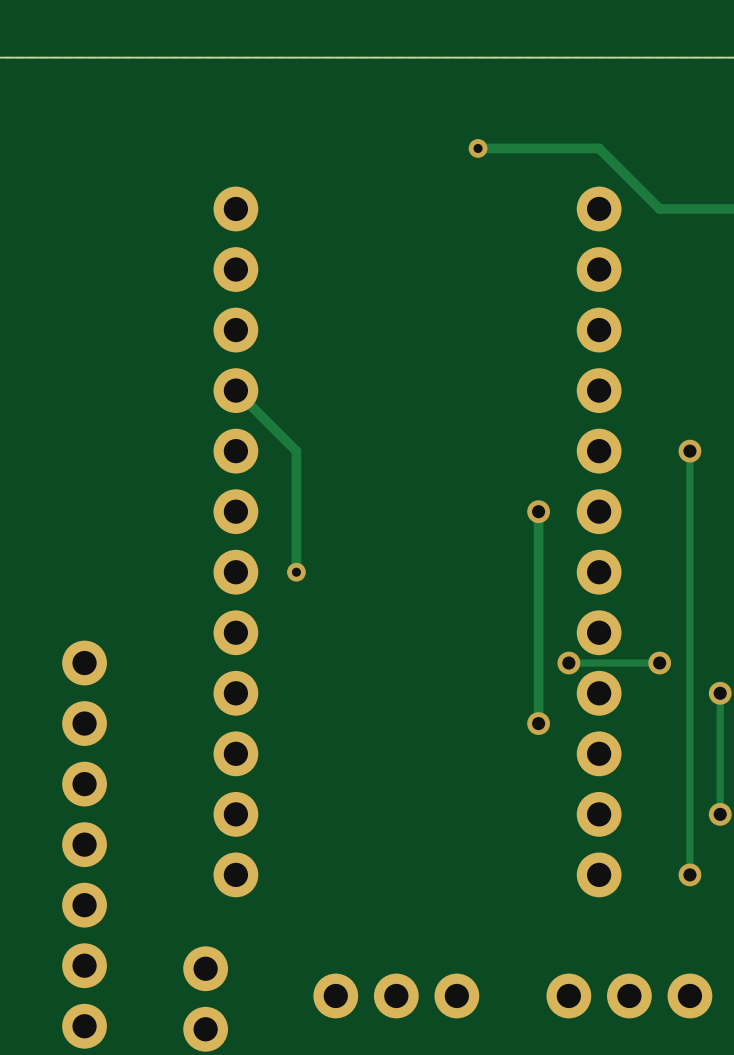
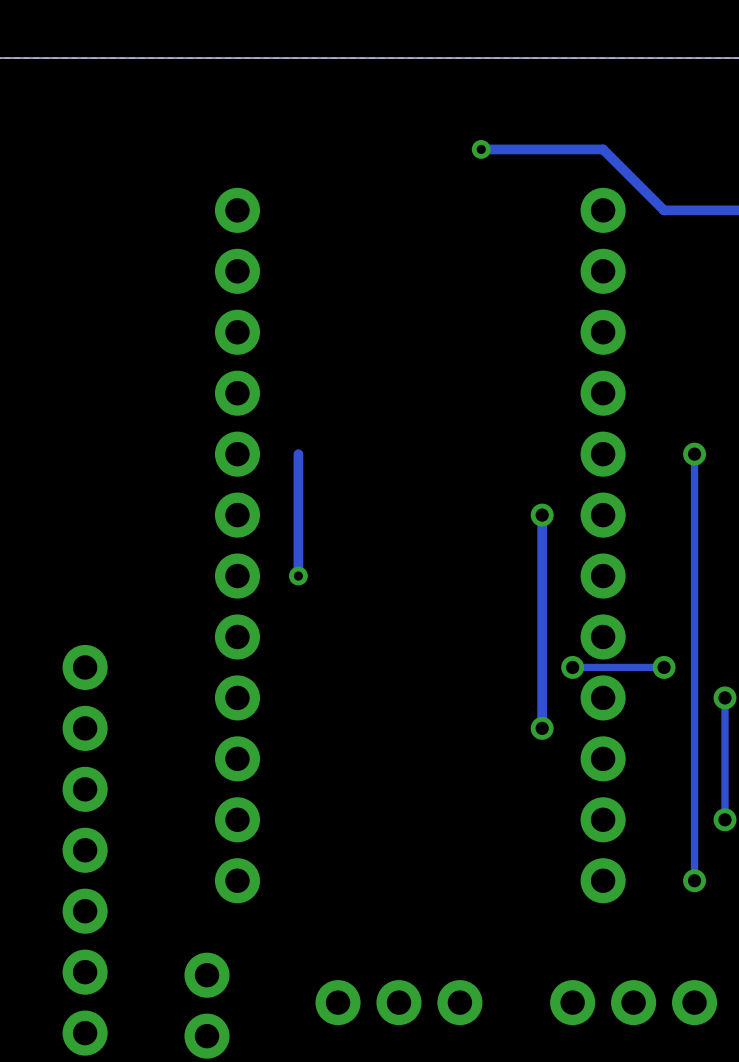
track: (235, 390) (296, 451) -> none

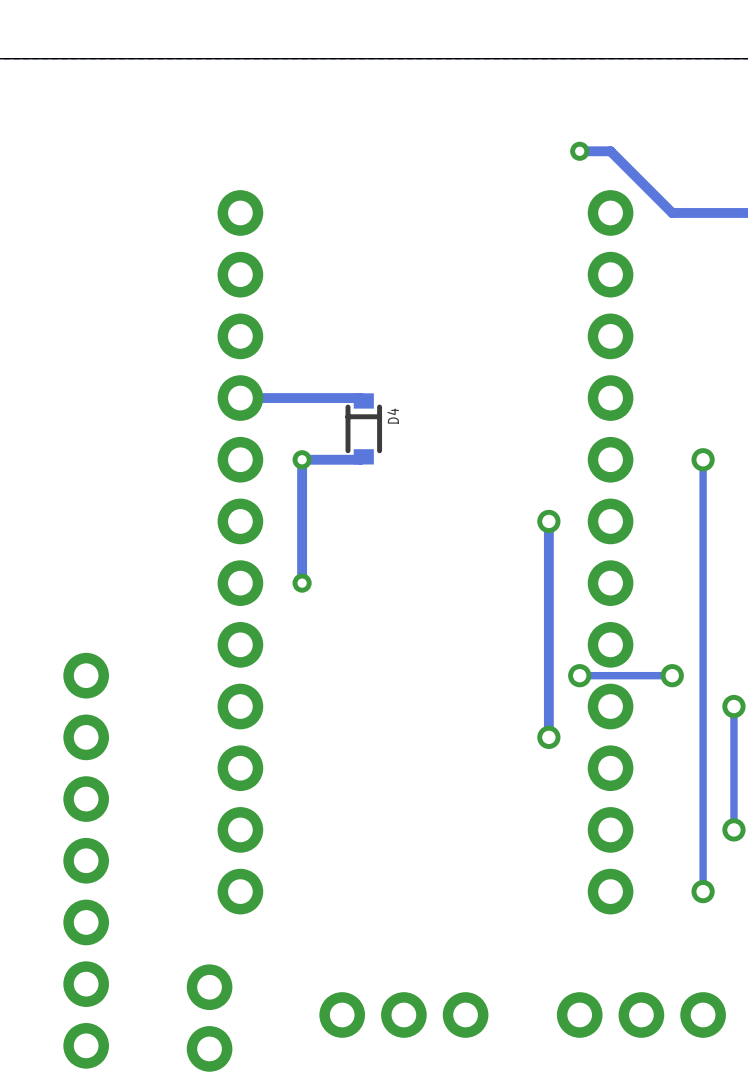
via position: (481, 149) -> (579, 151)
track: (572, 149) (481, 149) -> none
track: none -> (240, 398) (360, 398) (363, 400)
D4: none -> (363, 428)
track: none -> (363, 456) (360, 459) (302, 459)
via: none -> (302, 459)

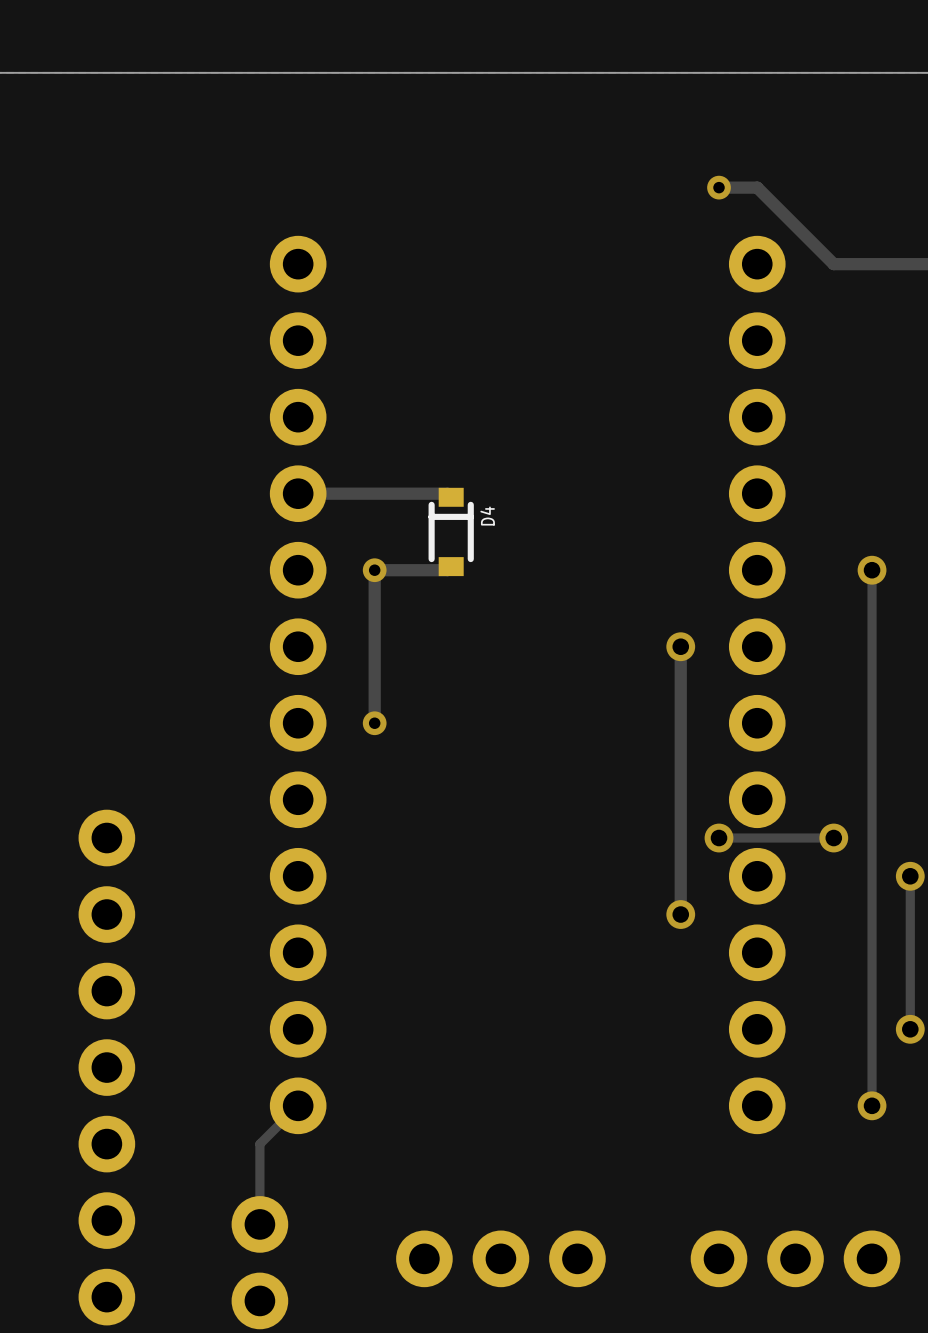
track: none -> (298, 1105) (259, 1144) (259, 1224)

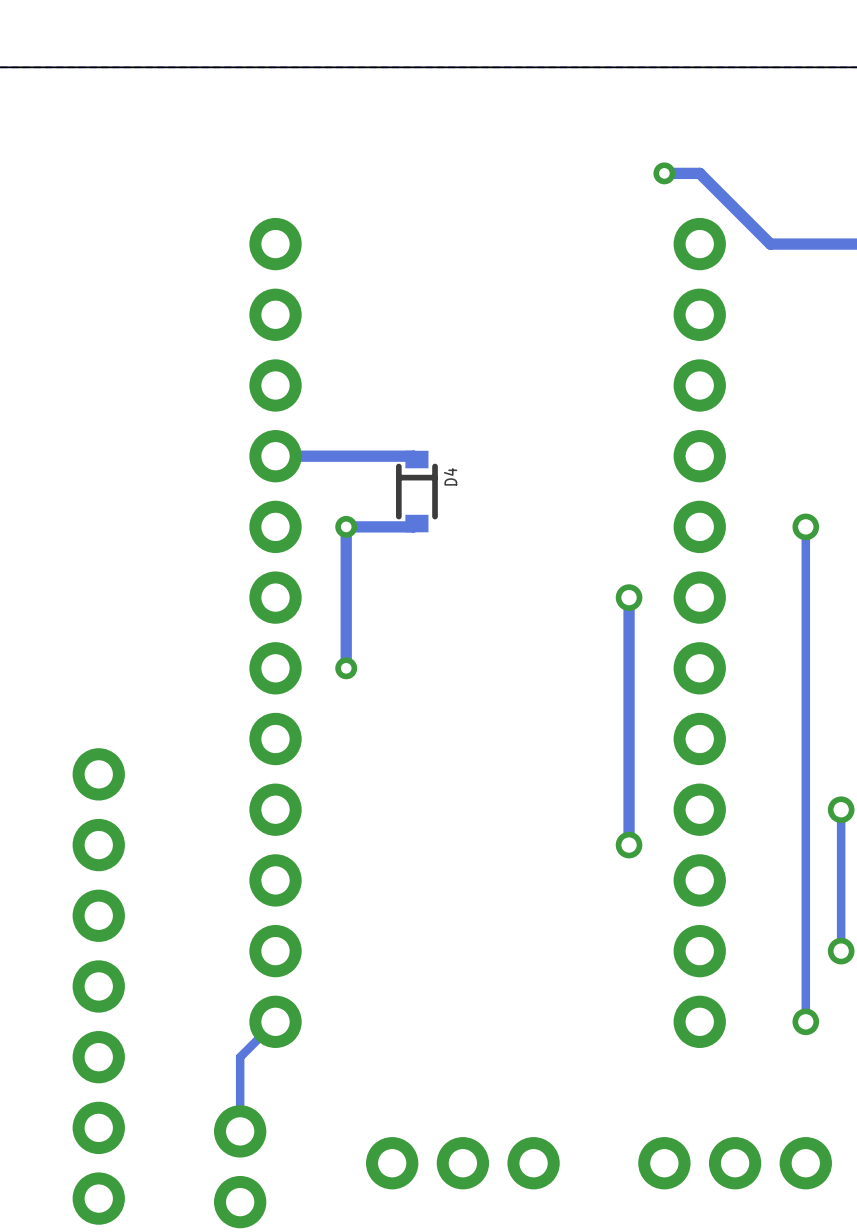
via: (719, 838) -> none
track: (833, 838) (719, 838) -> none
via: (833, 838) -> none

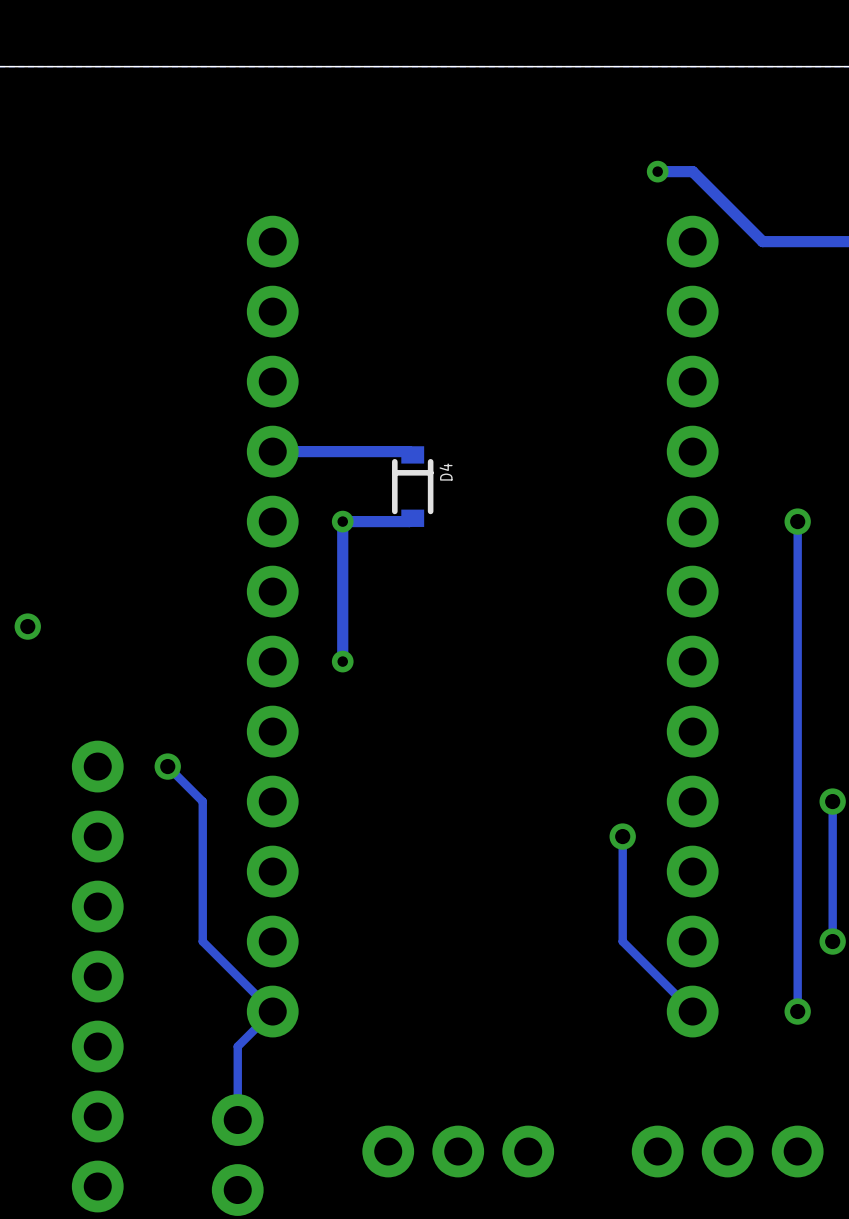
track: (629, 597) (629, 845) -> (692, 1011) (622, 941) (622, 836)
via: (629, 597) -> none
via: none -> (27, 626)
track: none -> (167, 766) (202, 801) (202, 941) (272, 1011)
via: none -> (167, 766)

